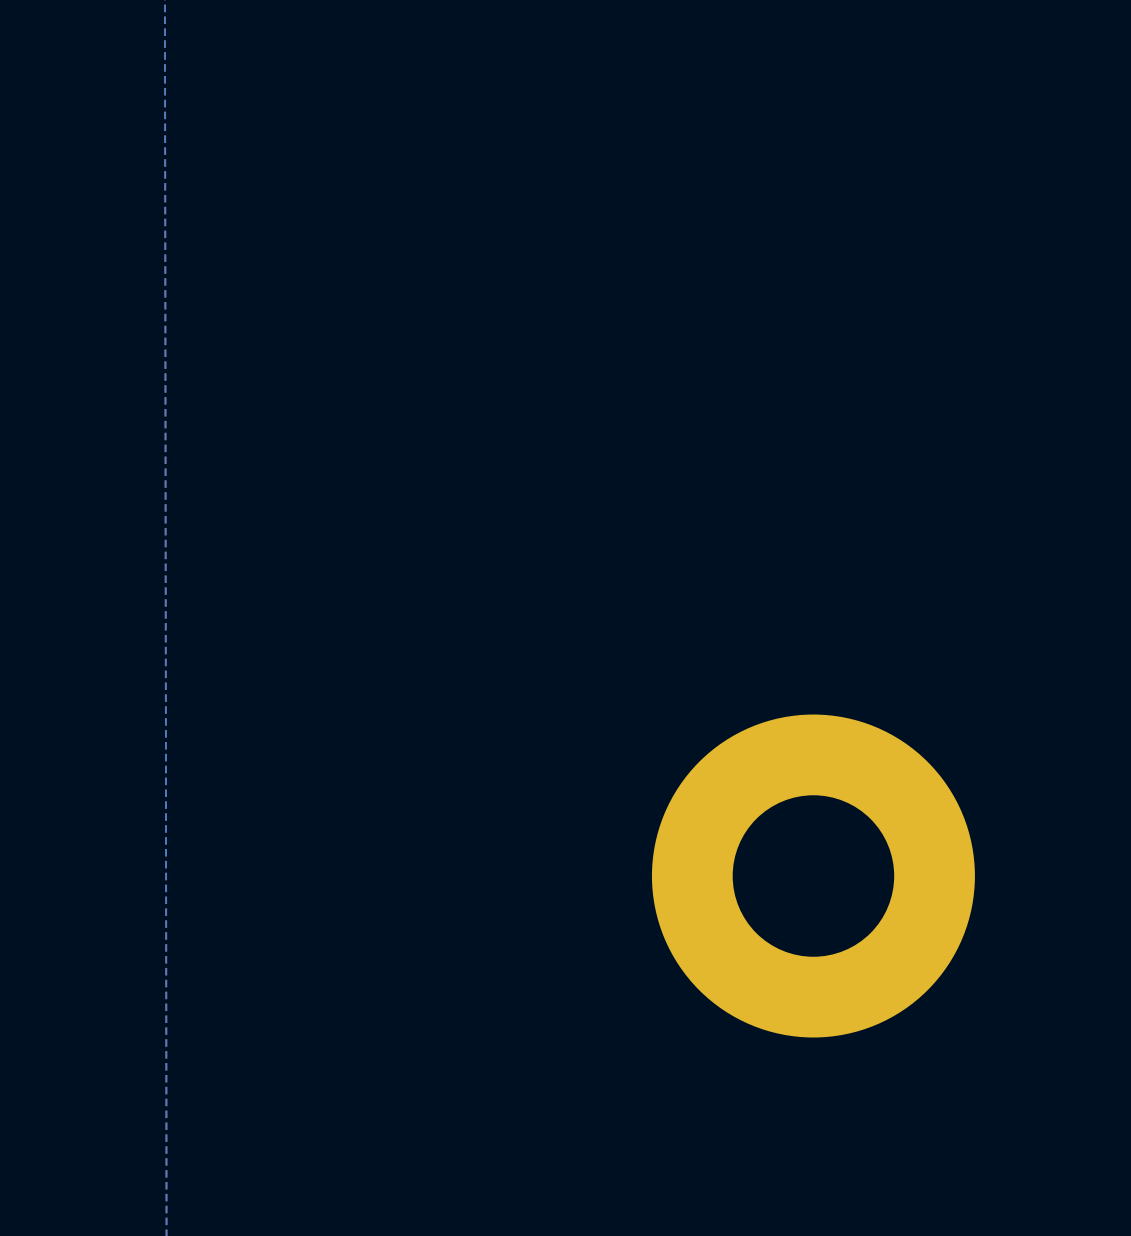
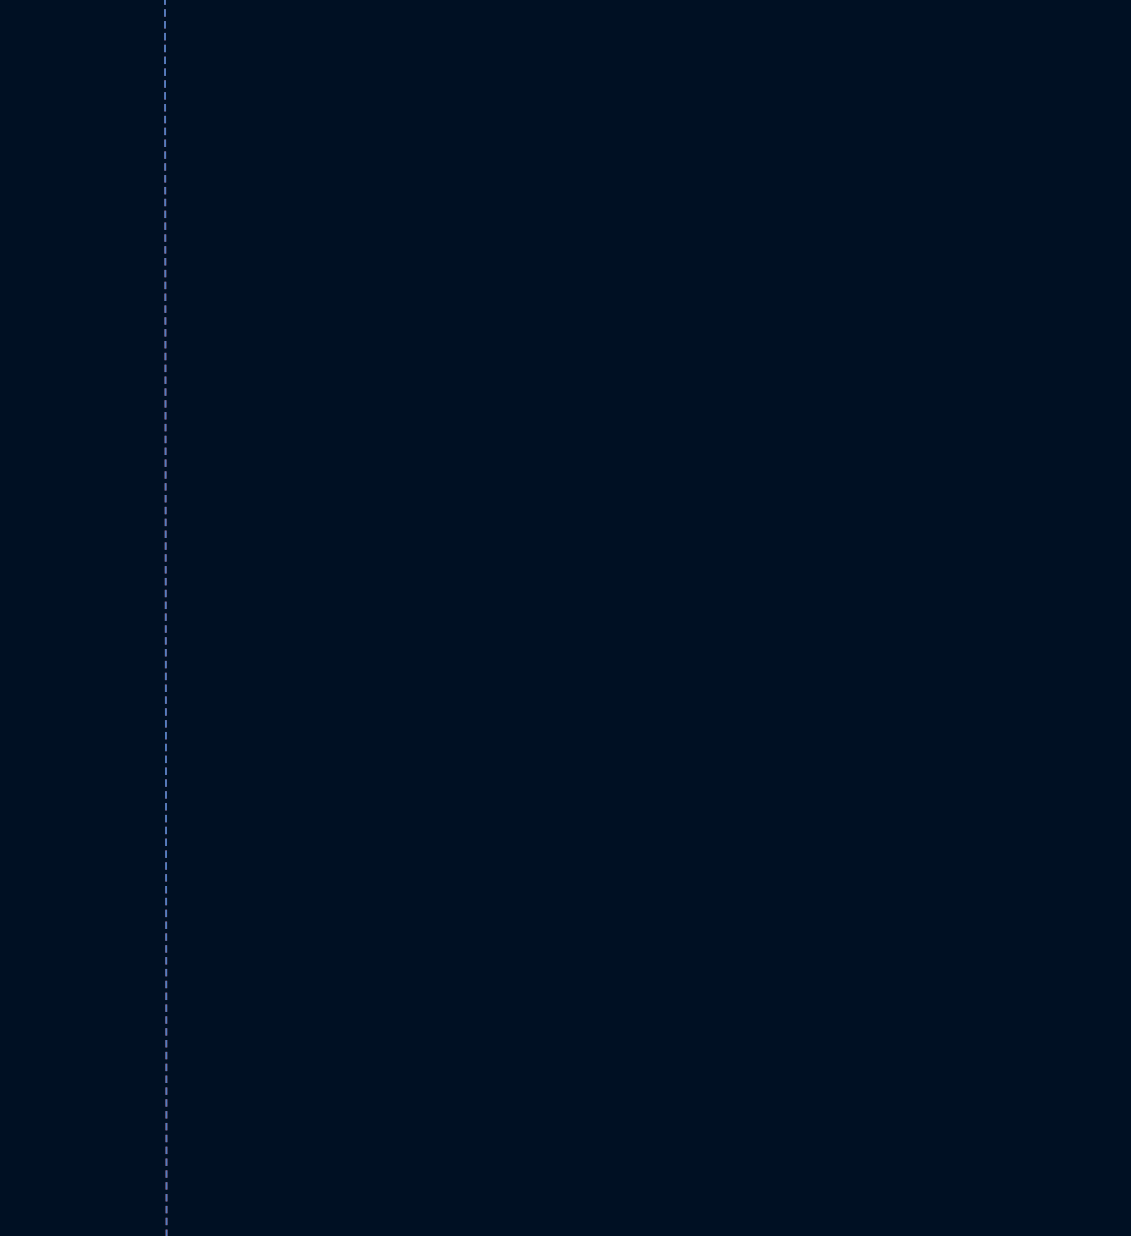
part: (813, 876) -> none

